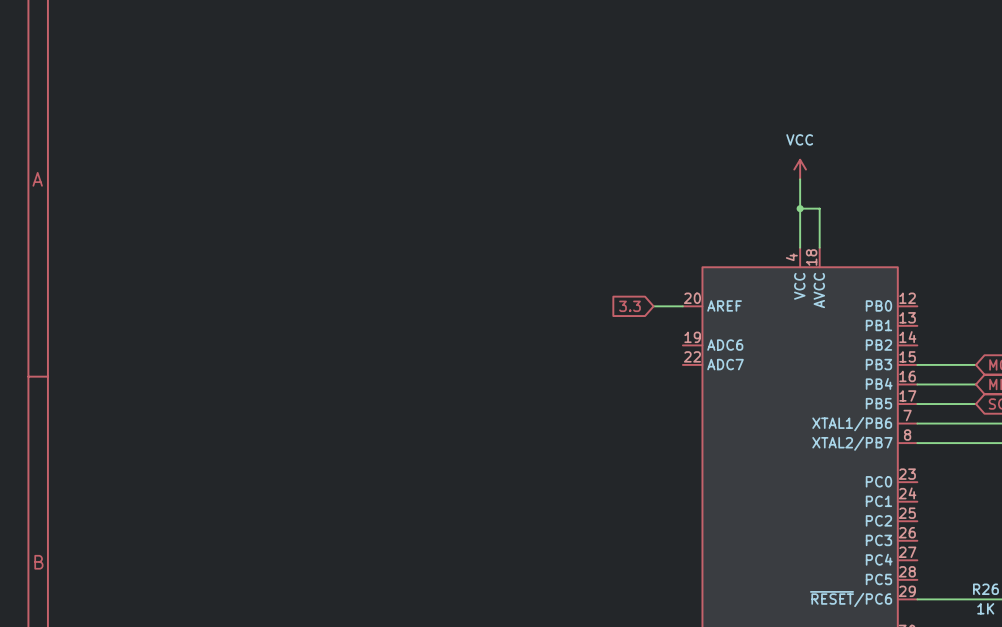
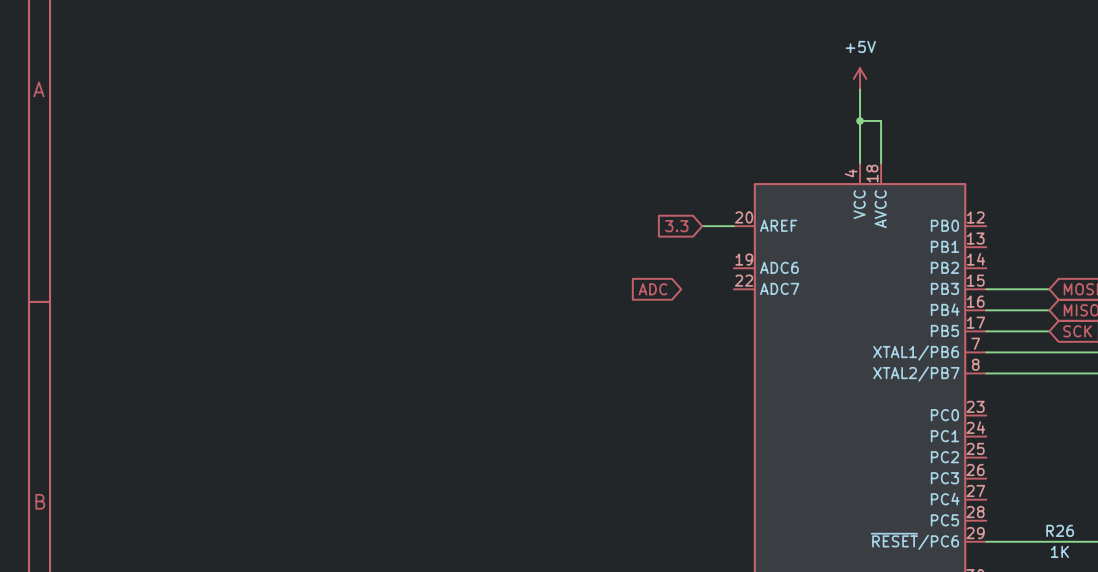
power symbol: VCC (800, 169) -> +5V (860, 78)
global label: none -> ADC (653, 289)

